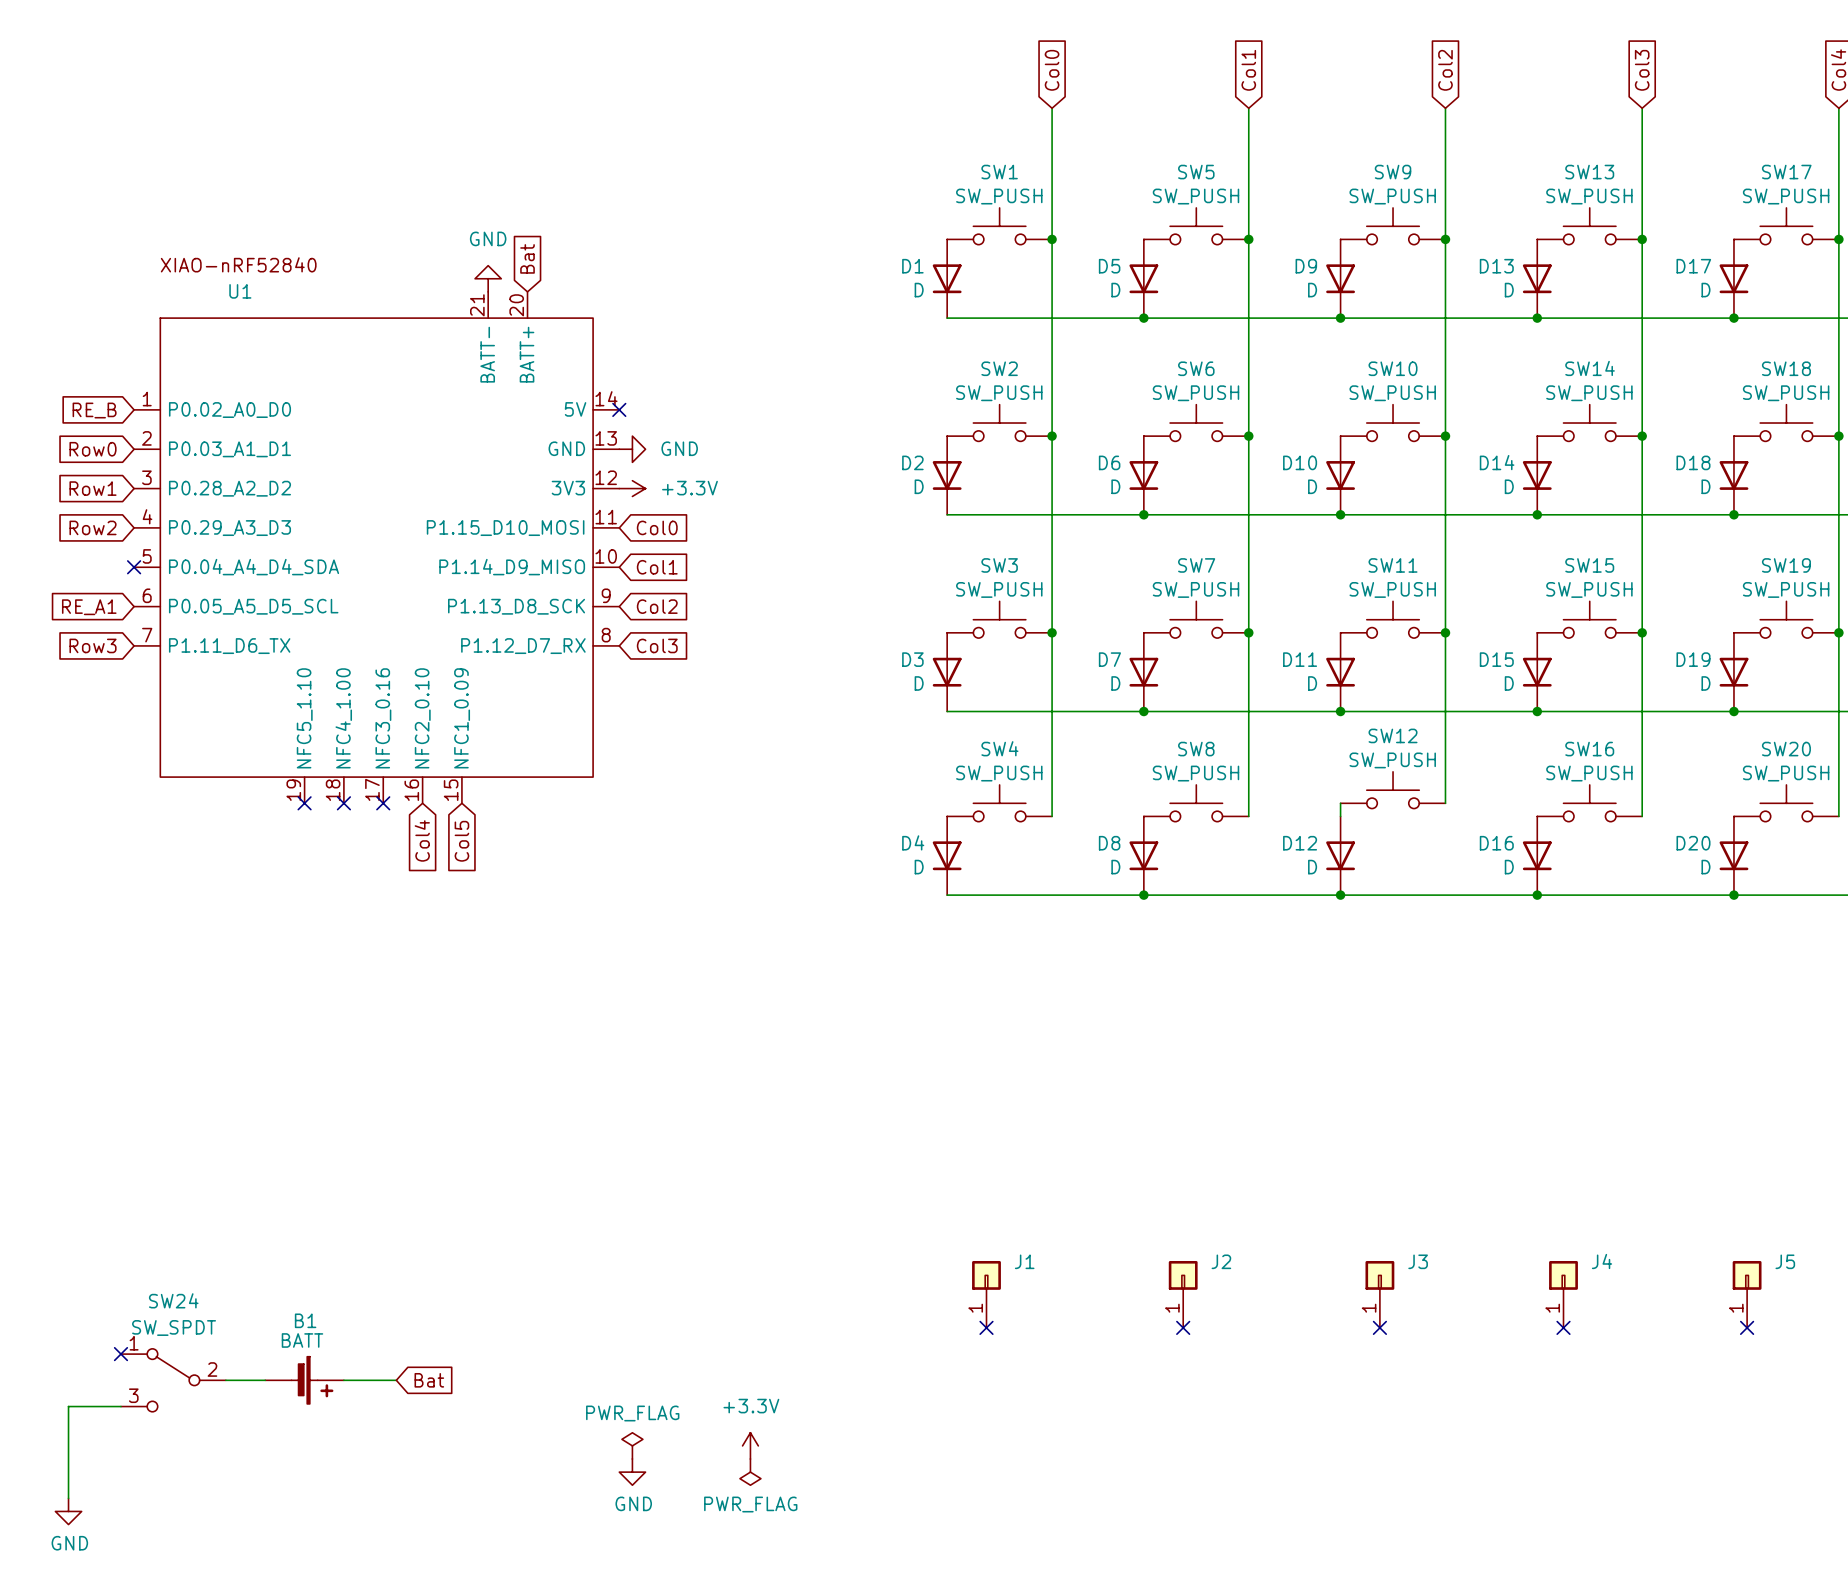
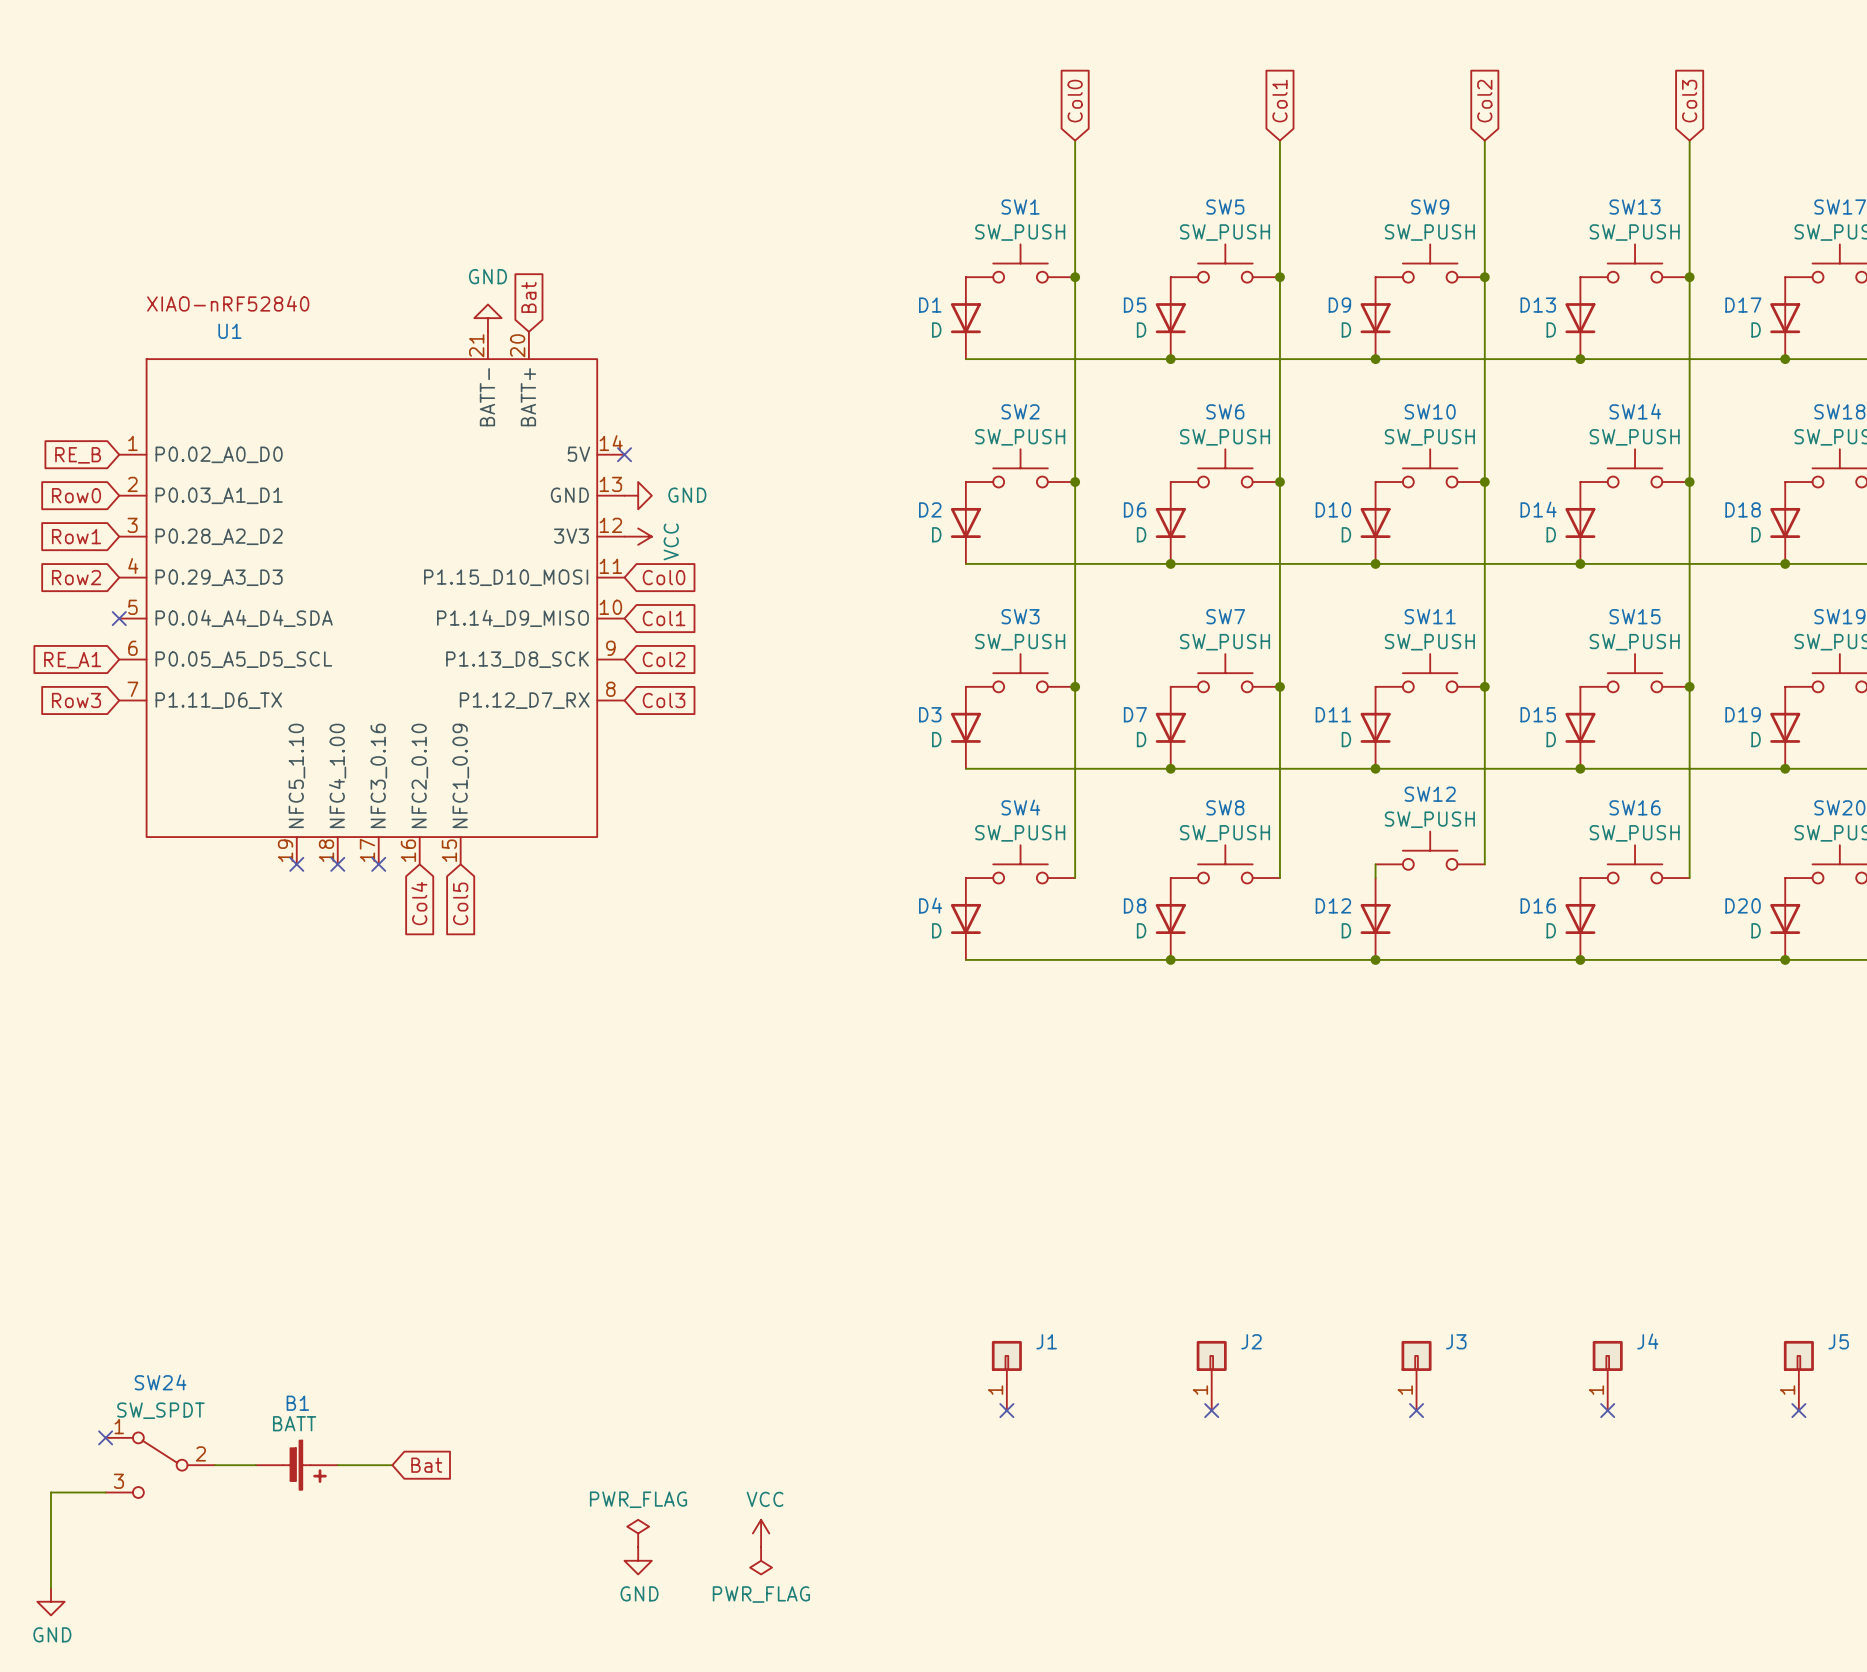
power symbol: +3.3V (632, 488) -> VCC (638, 536)
power symbol: +3.3V (750, 1445) -> VCC (761, 1533)

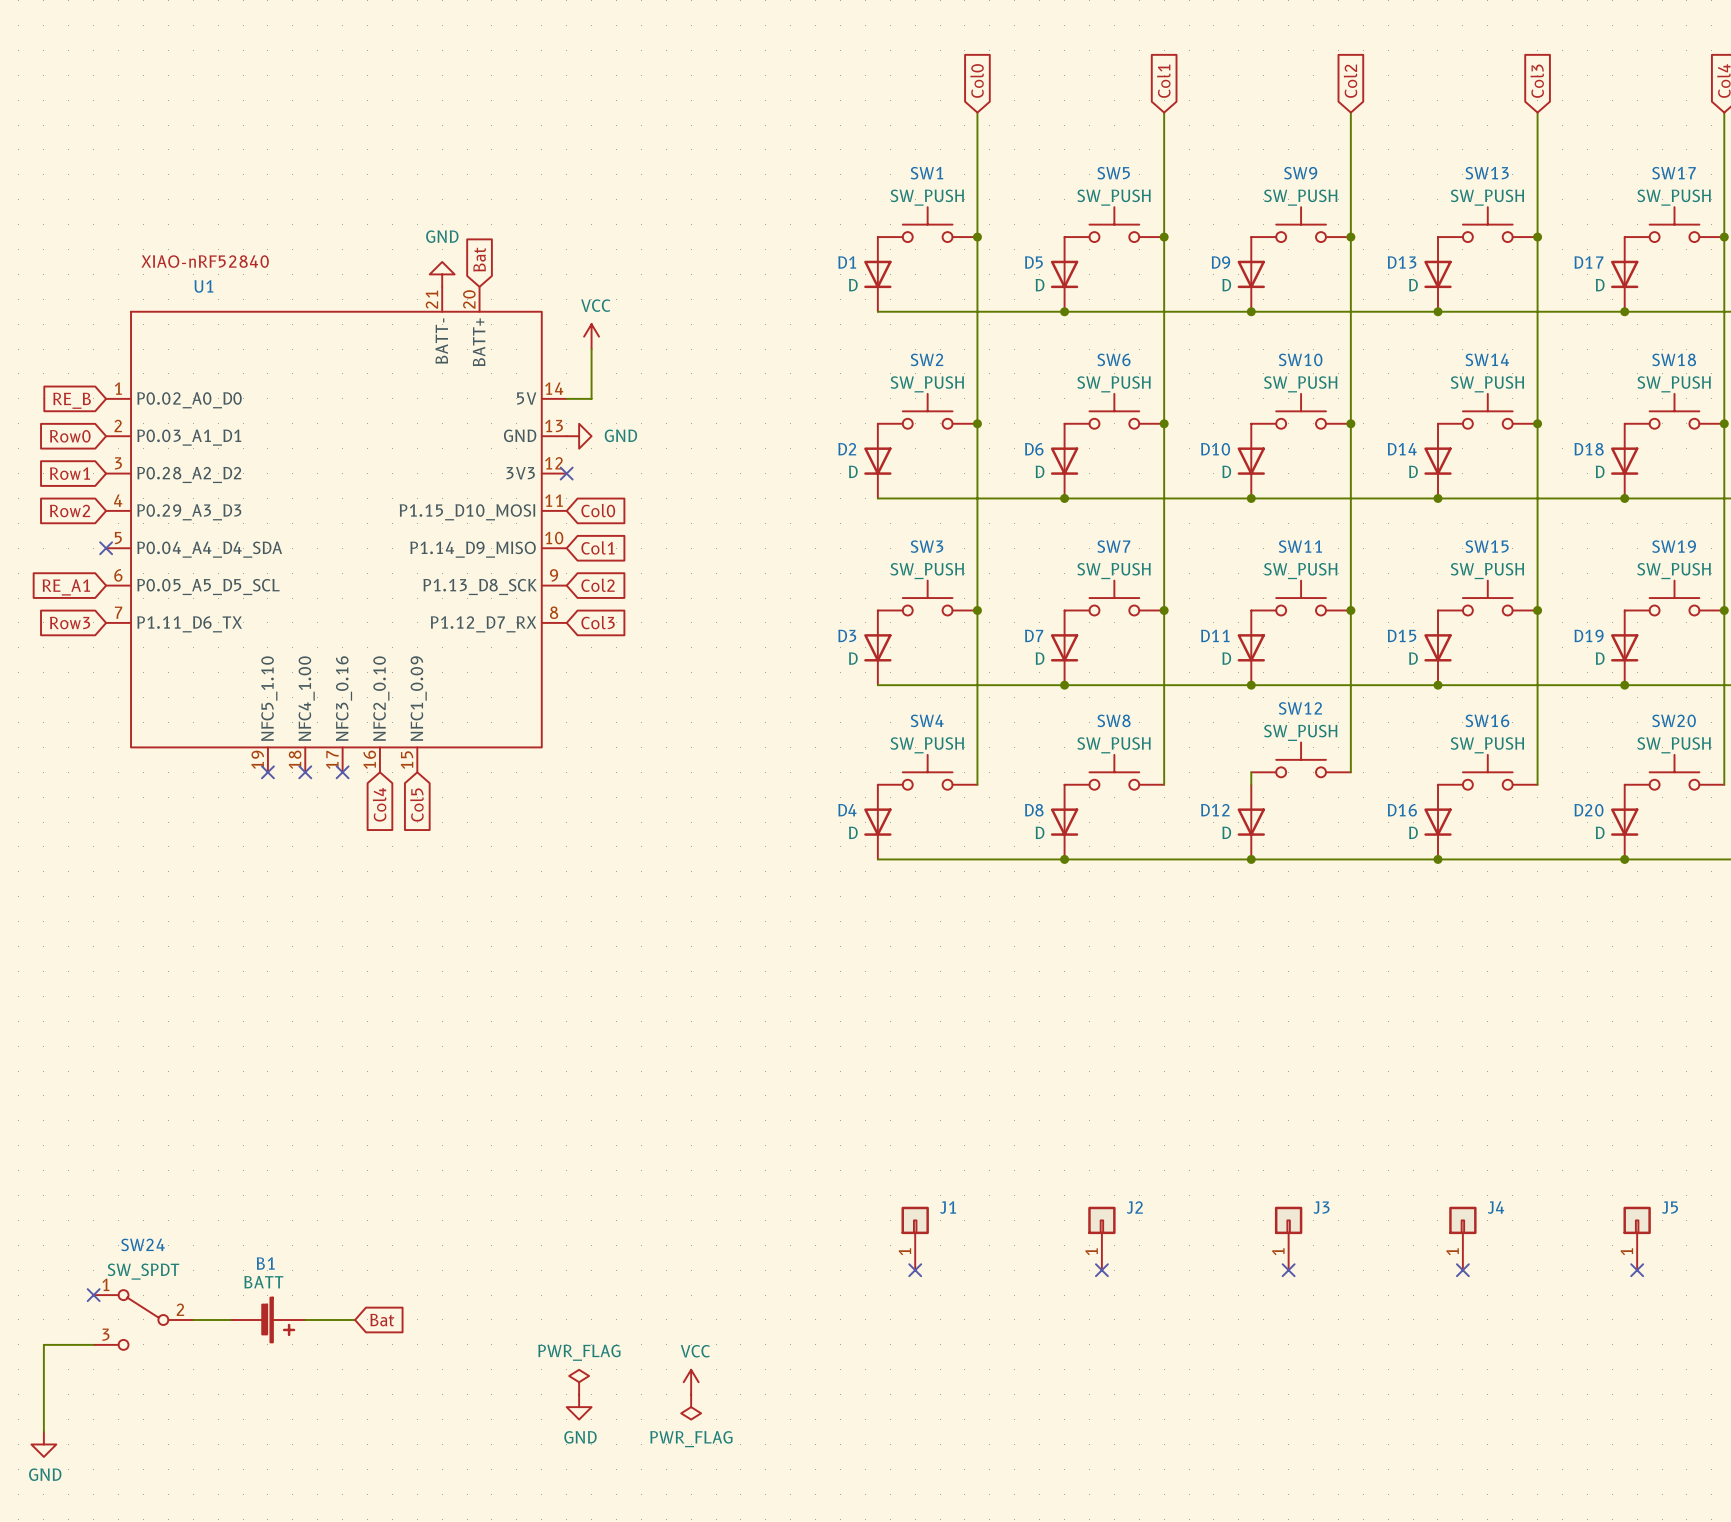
wire: none -> (591, 349) (591, 398) (566, 398)
no-connect mark: (624, 454) -> none
no-connect mark: none -> (566, 473)
power symbol rotation: 0° (638, 536) -> 90° counterclockwise (591, 336)
power symbol position: VCC (638, 536) -> VCC (591, 336)

